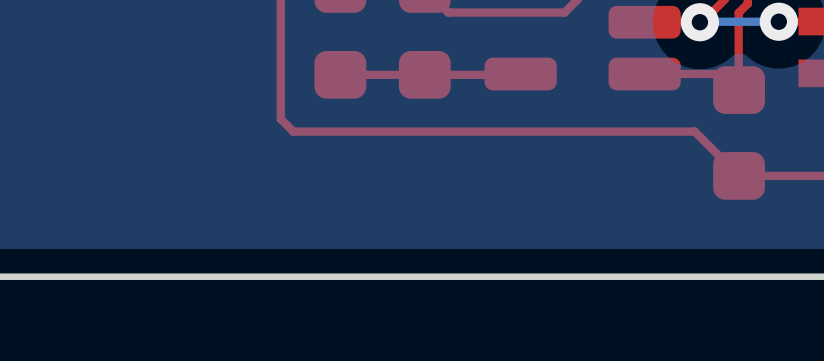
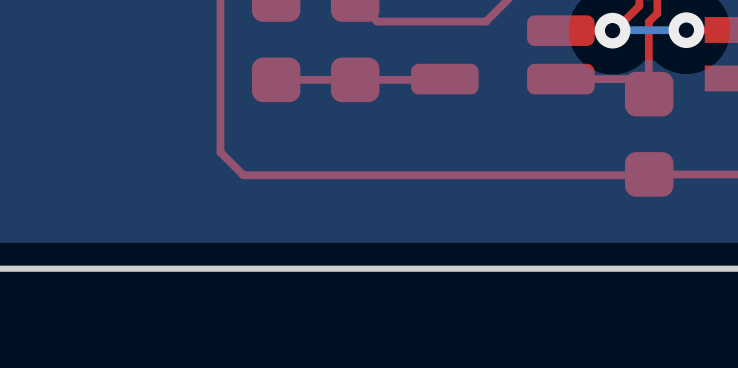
top track: (280, 119) (293, 131) (694, 131) (739, 175) -> (220, 121) (220, 152) (243, 175) (649, 174)

